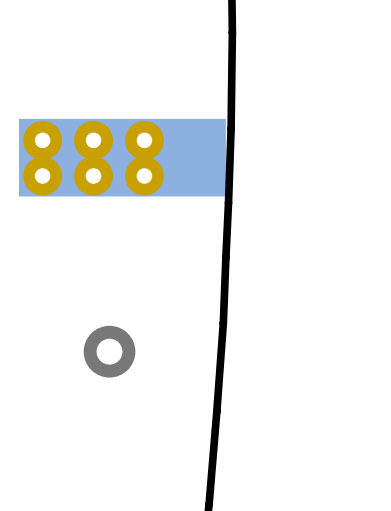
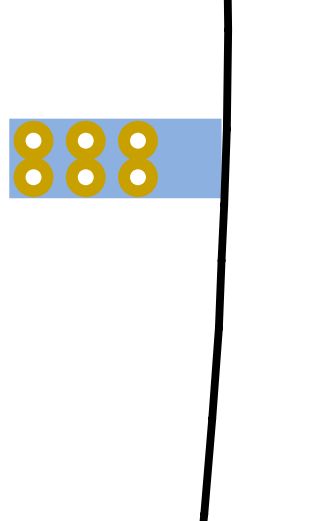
via: (109, 351) -> none

